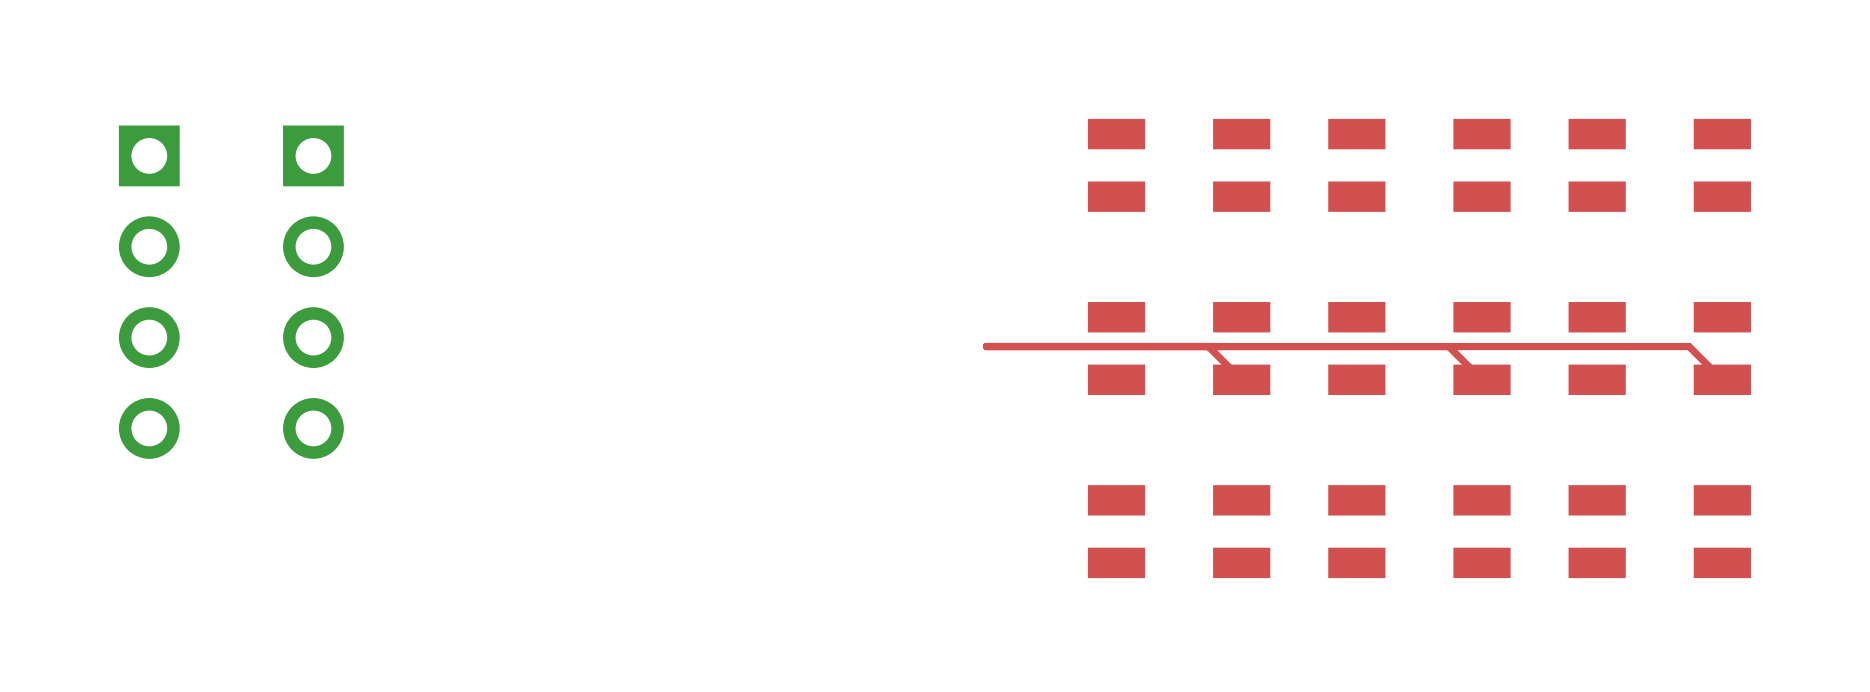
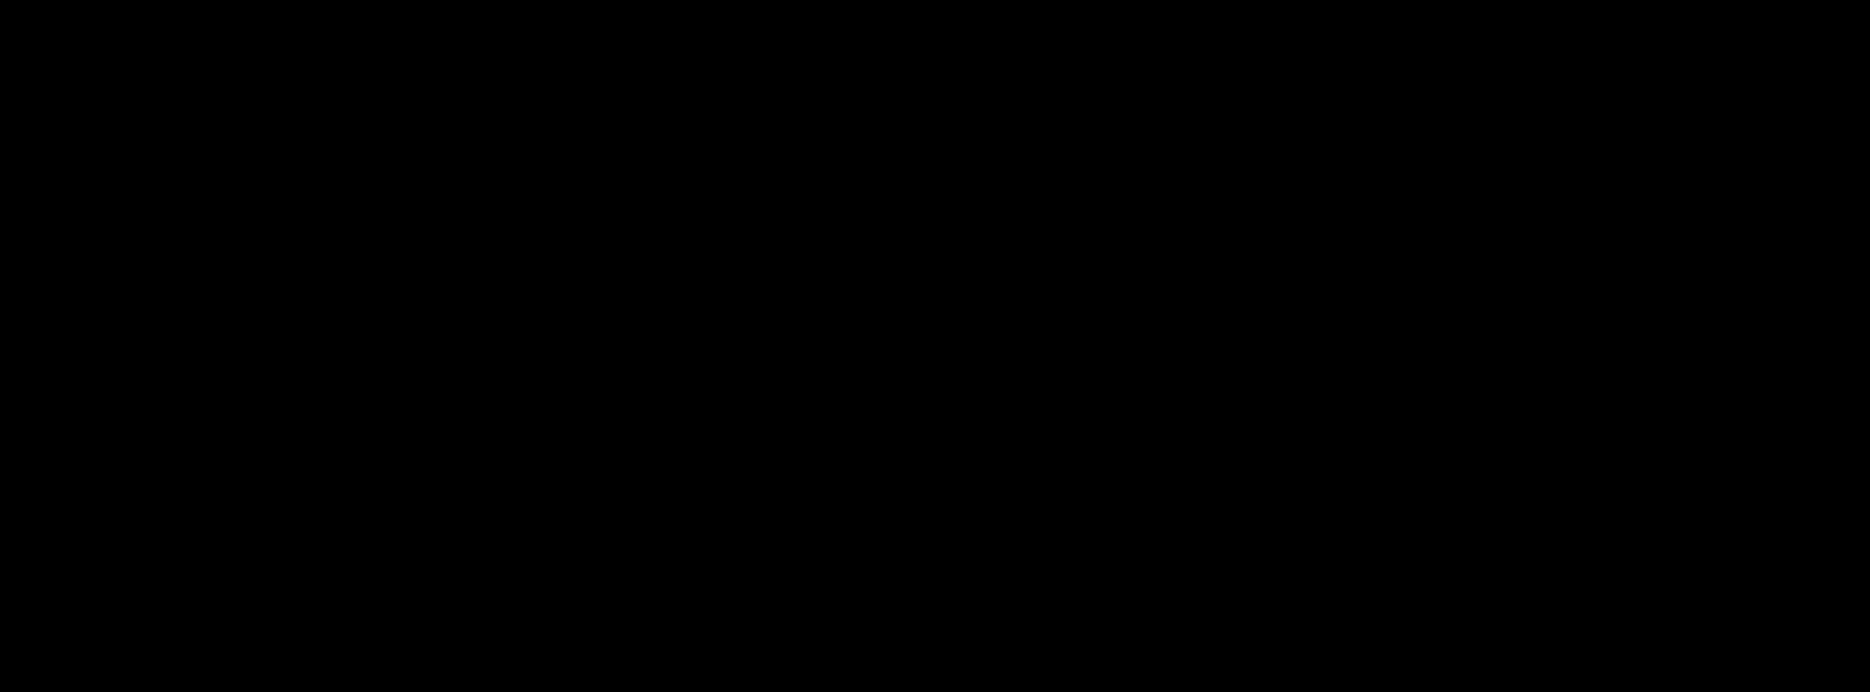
part: (1179, 165) -> none
part: (1419, 165) -> none
part: (1659, 165) -> none
part: (149, 292) -> none
part: (313, 292) -> none
top track: (986, 346) (1689, 346) (1722, 379) -> none
top track: (1208, 346) (1241, 379) -> none
top track: (1448, 346) (1482, 379) -> none
part: (1179, 348) -> none
part: (1419, 348) -> none
part: (1659, 348) -> none
part: (1179, 531) -> none
part: (1419, 531) -> none
part: (1659, 531) -> none

